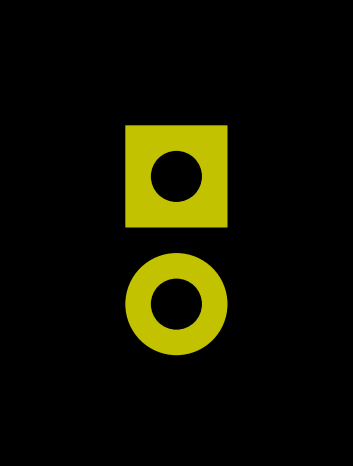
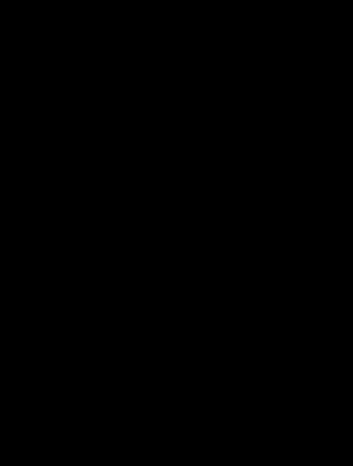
part: (176, 240) -> none

